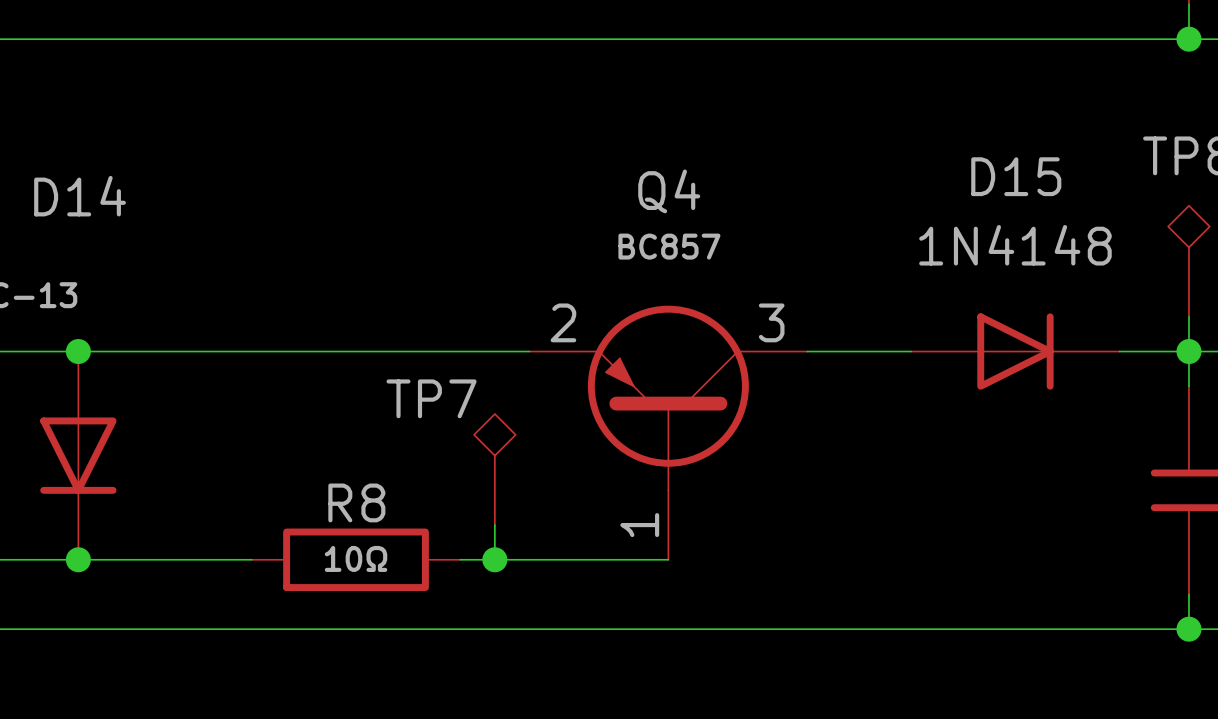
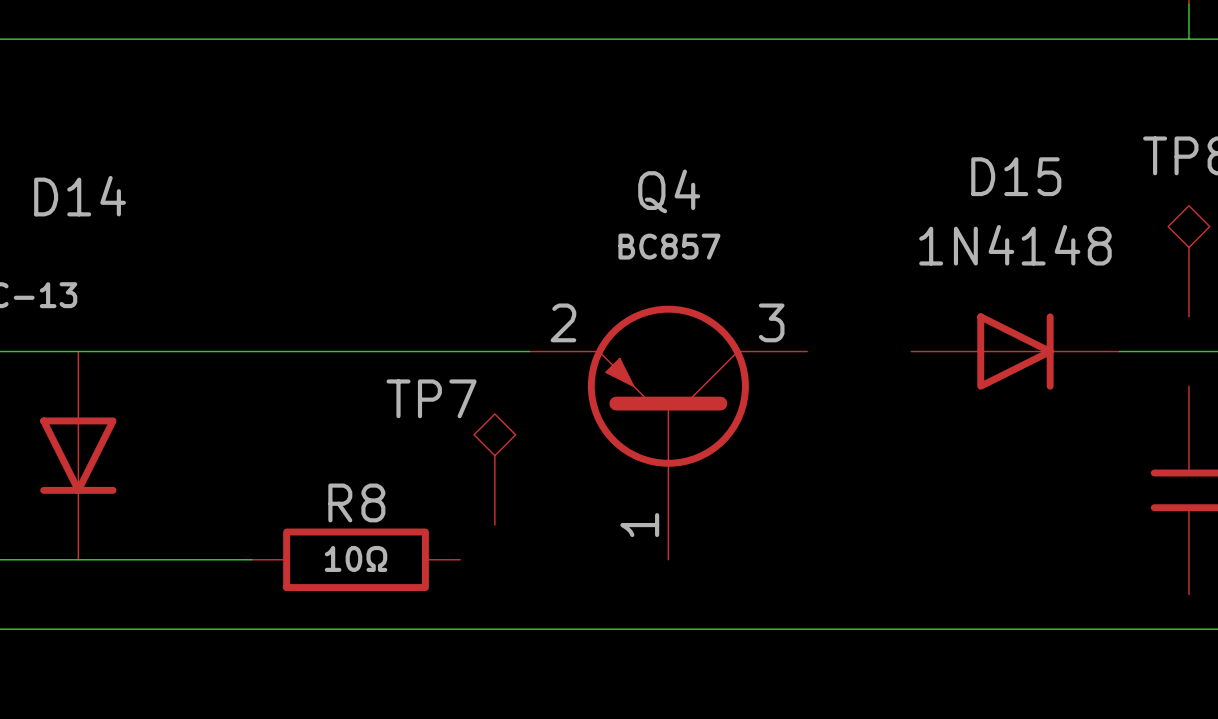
junction: (1188, 39) -> none
wire: (1188, 316) (1188, 386) -> none
junction: (78, 351) -> none
wire: (807, 351) (911, 351) -> none
junction: (1188, 351) -> none
wire: (494, 525) (494, 559) -> none
junction: (78, 559) -> none
wire: (460, 559) (668, 559) -> none
junction: (494, 559) -> none
wire: (1188, 594) (1188, 629) -> none
junction: (1188, 629) -> none

